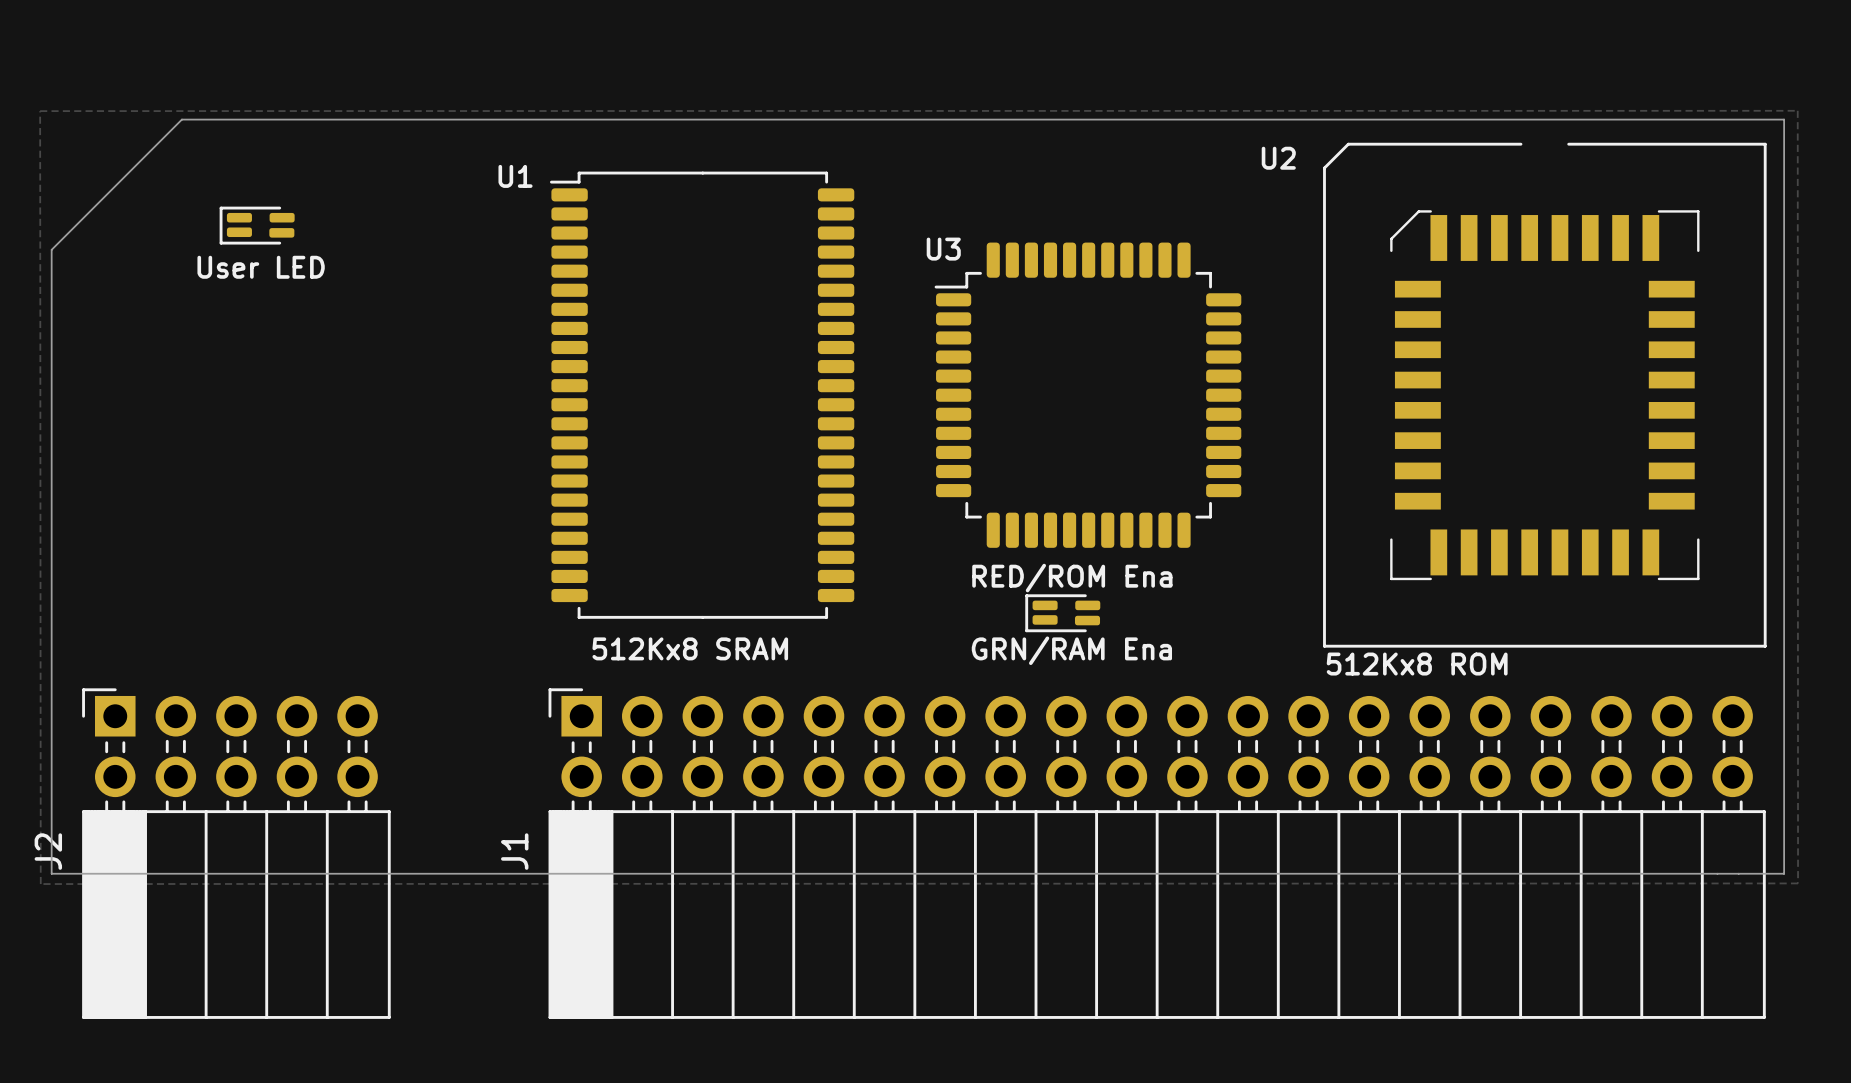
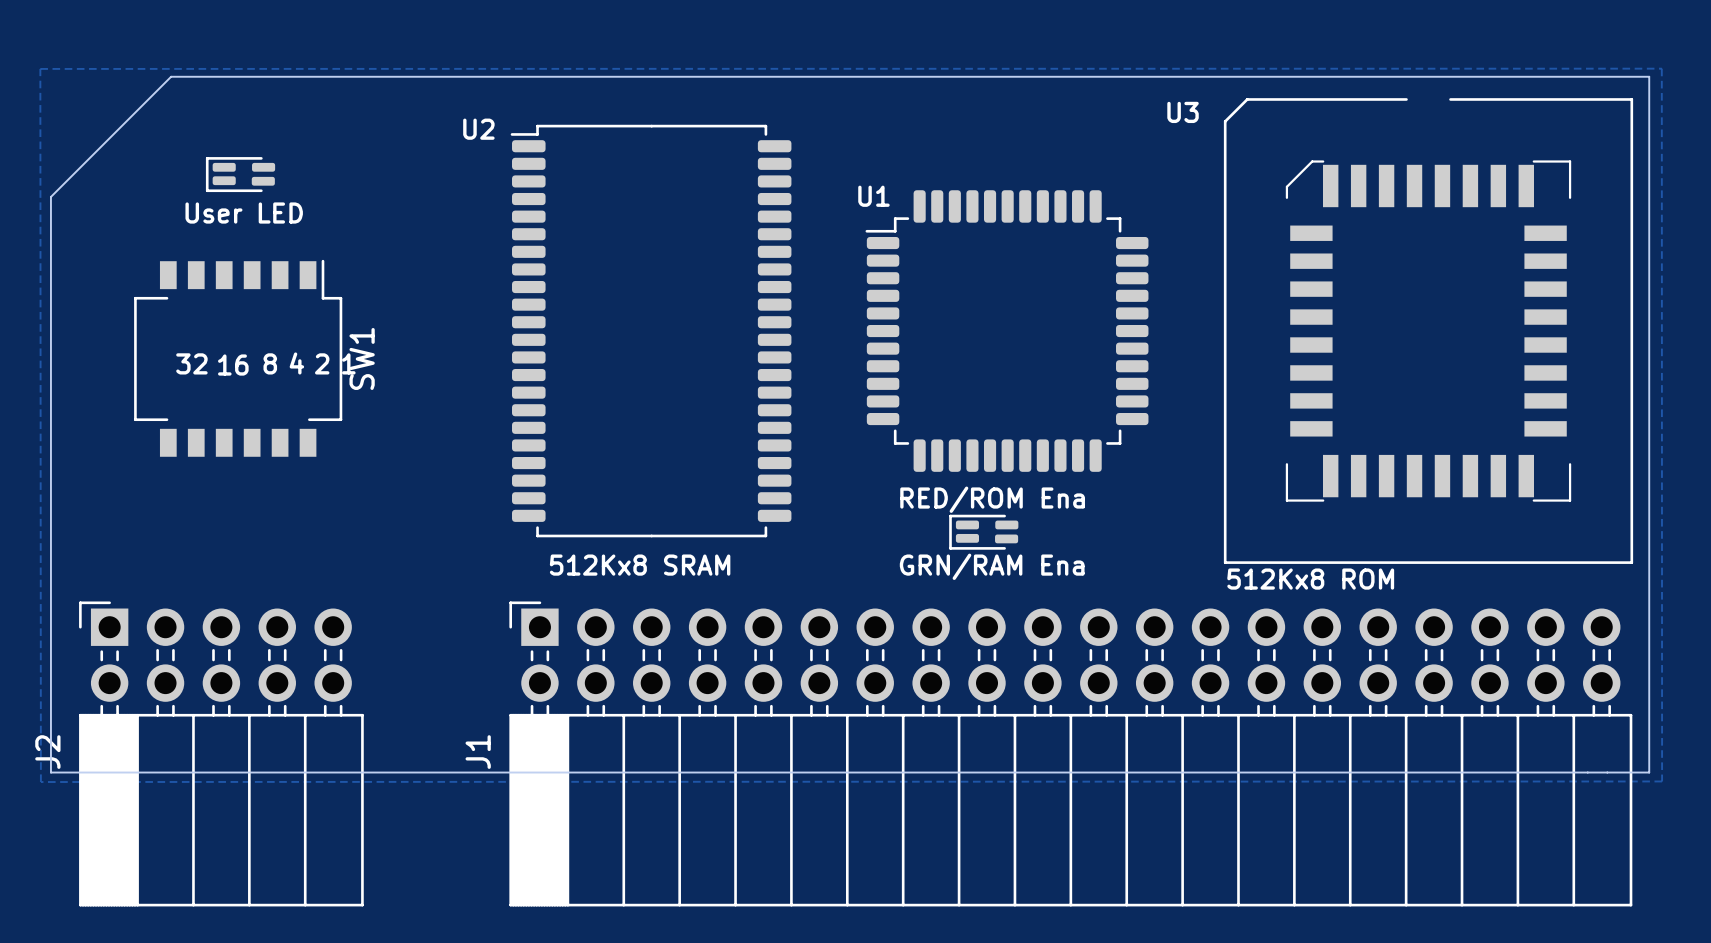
U2 name: U2 (1278, 158) -> U3 (1183, 112)
U1 name: U1 (515, 176) -> U2 (478, 129)
U3 name: U3 (943, 249) -> U1 (873, 196)
SW1: none -> (238, 358)
text: none -> 32 (191, 363)
text: none -> 8 (270, 363)
text: none -> 4 (296, 363)
text: none -> 2 (322, 363)
text: none -> 1 (348, 363)
text: none -> 16 (233, 365)

